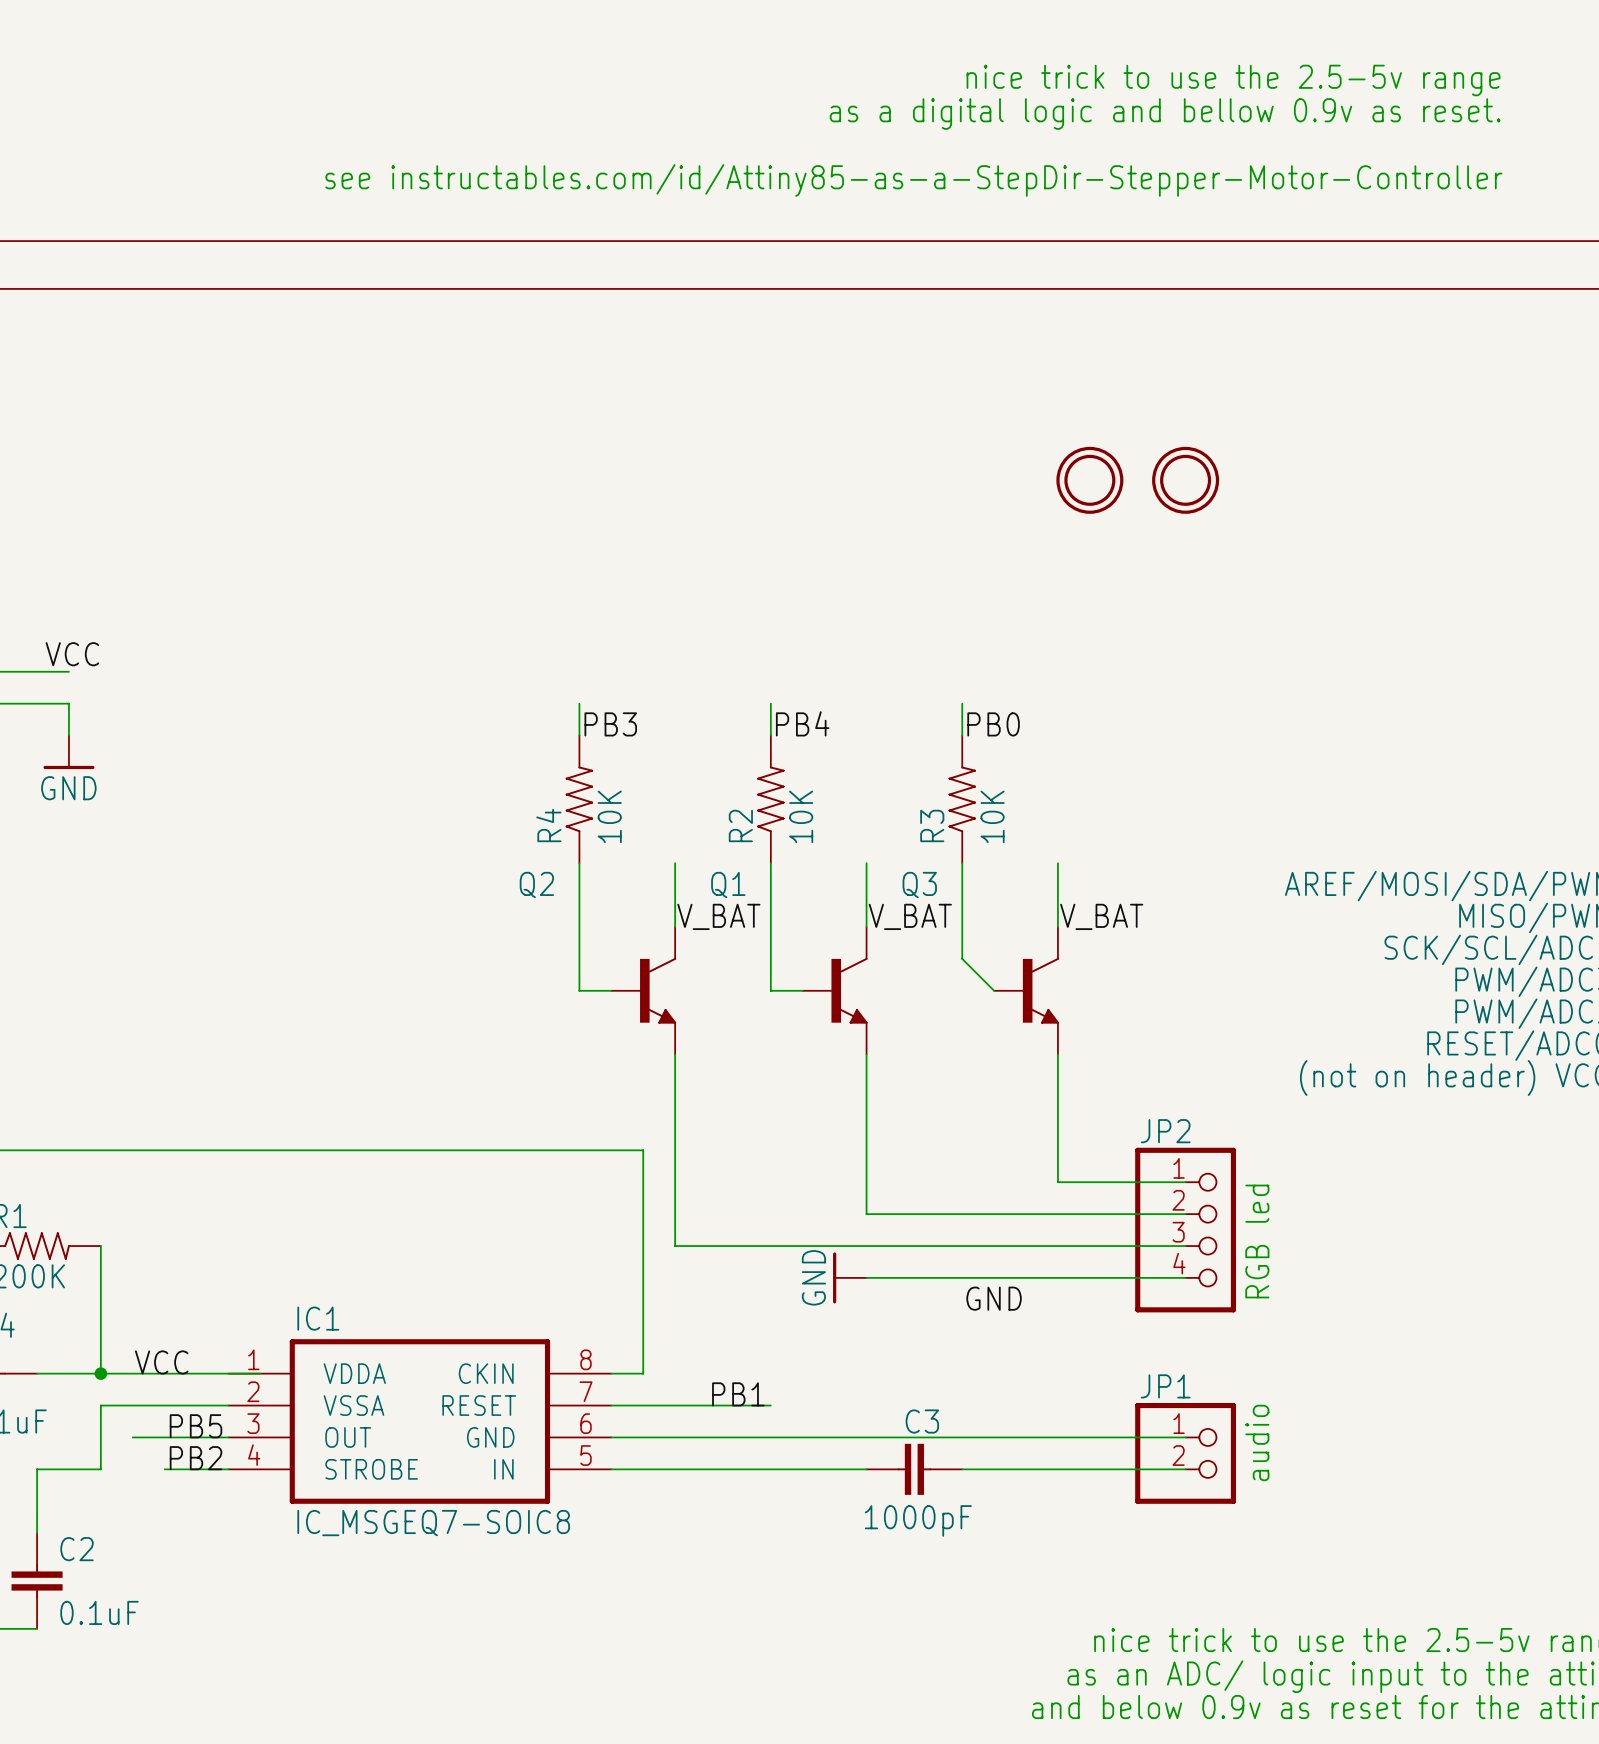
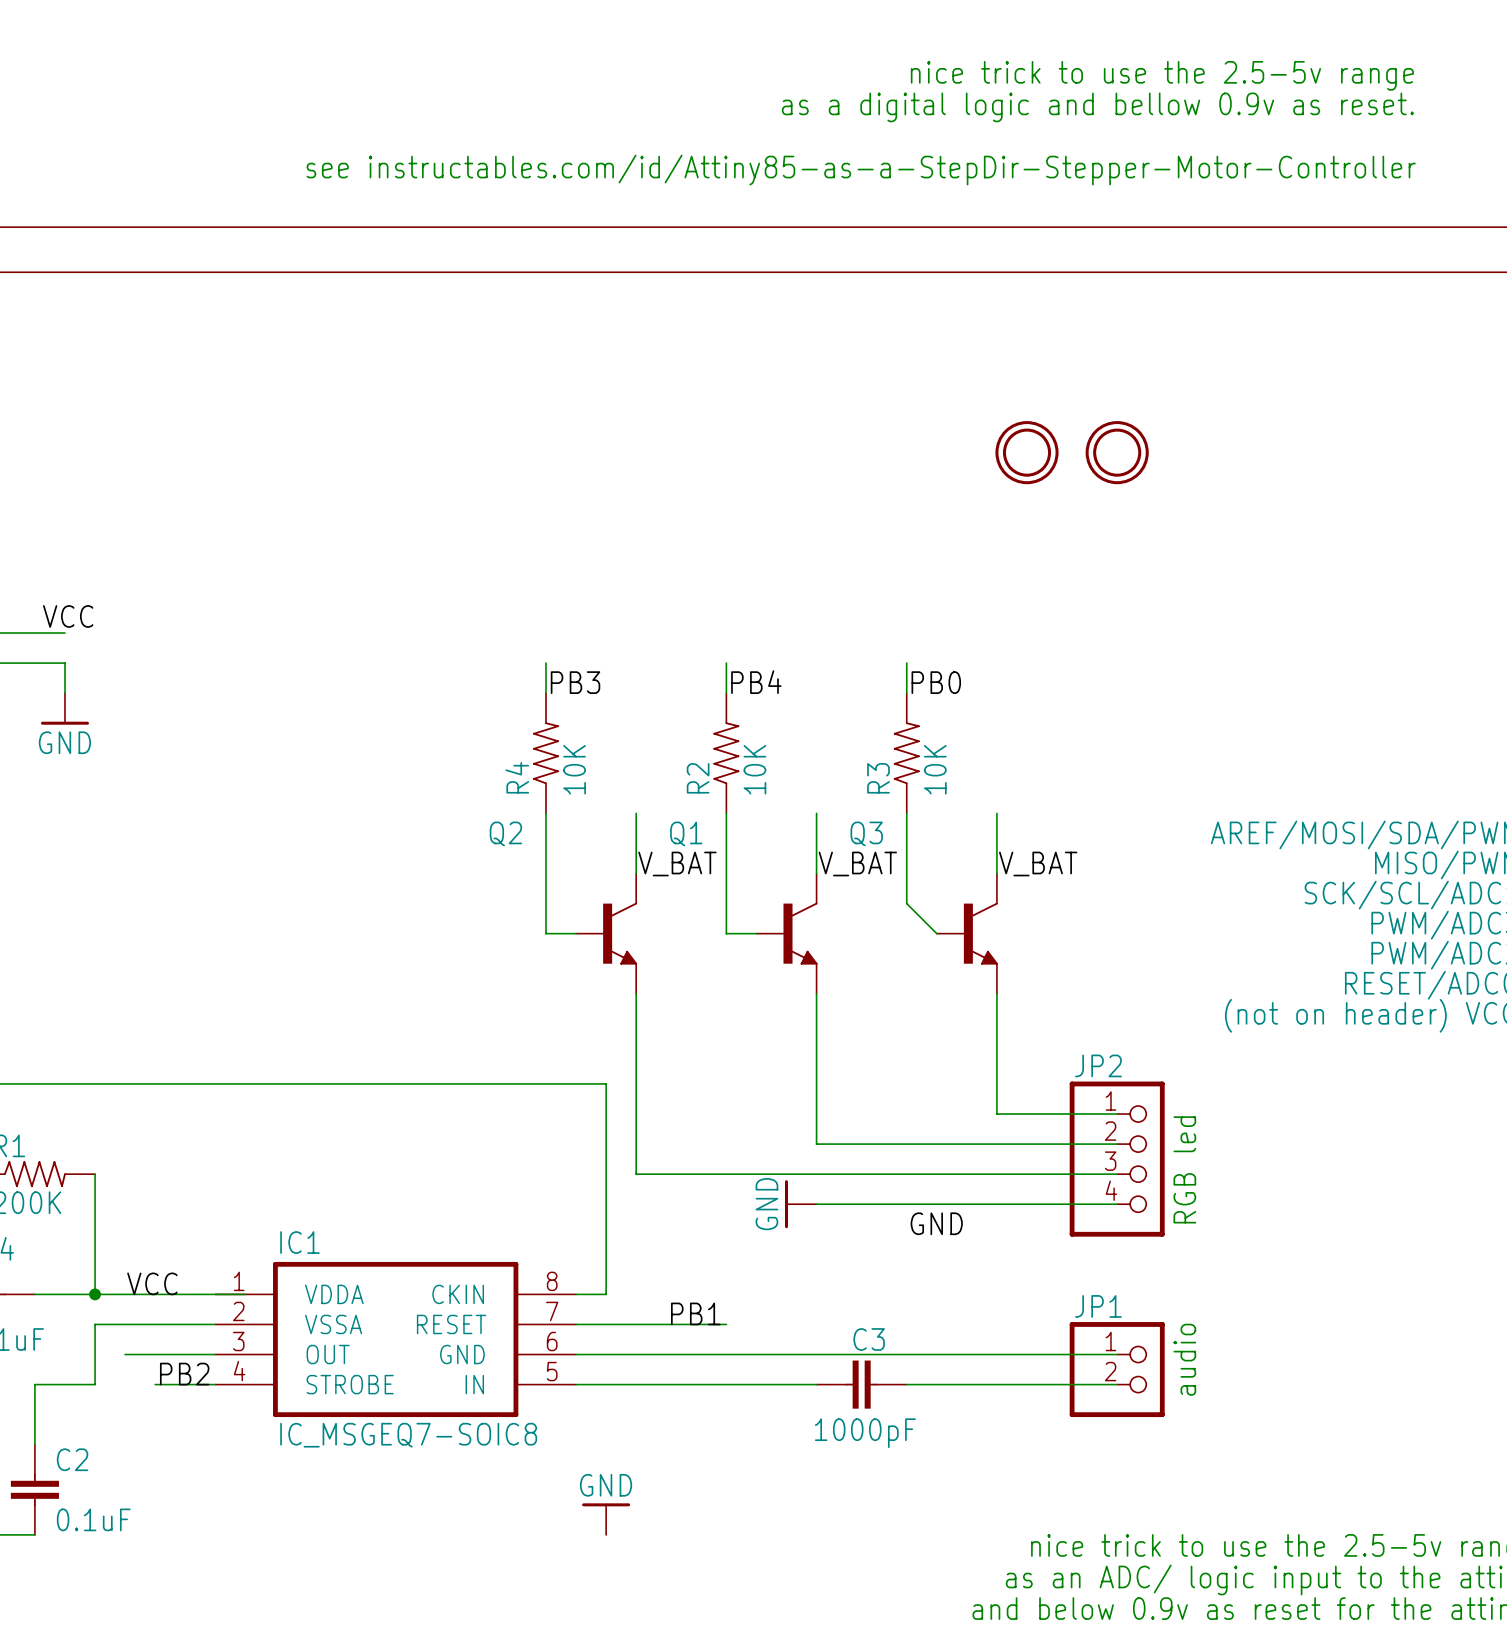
label: PB5 (196, 1426) -> none
power symbol: none -> GND (606, 1519)

